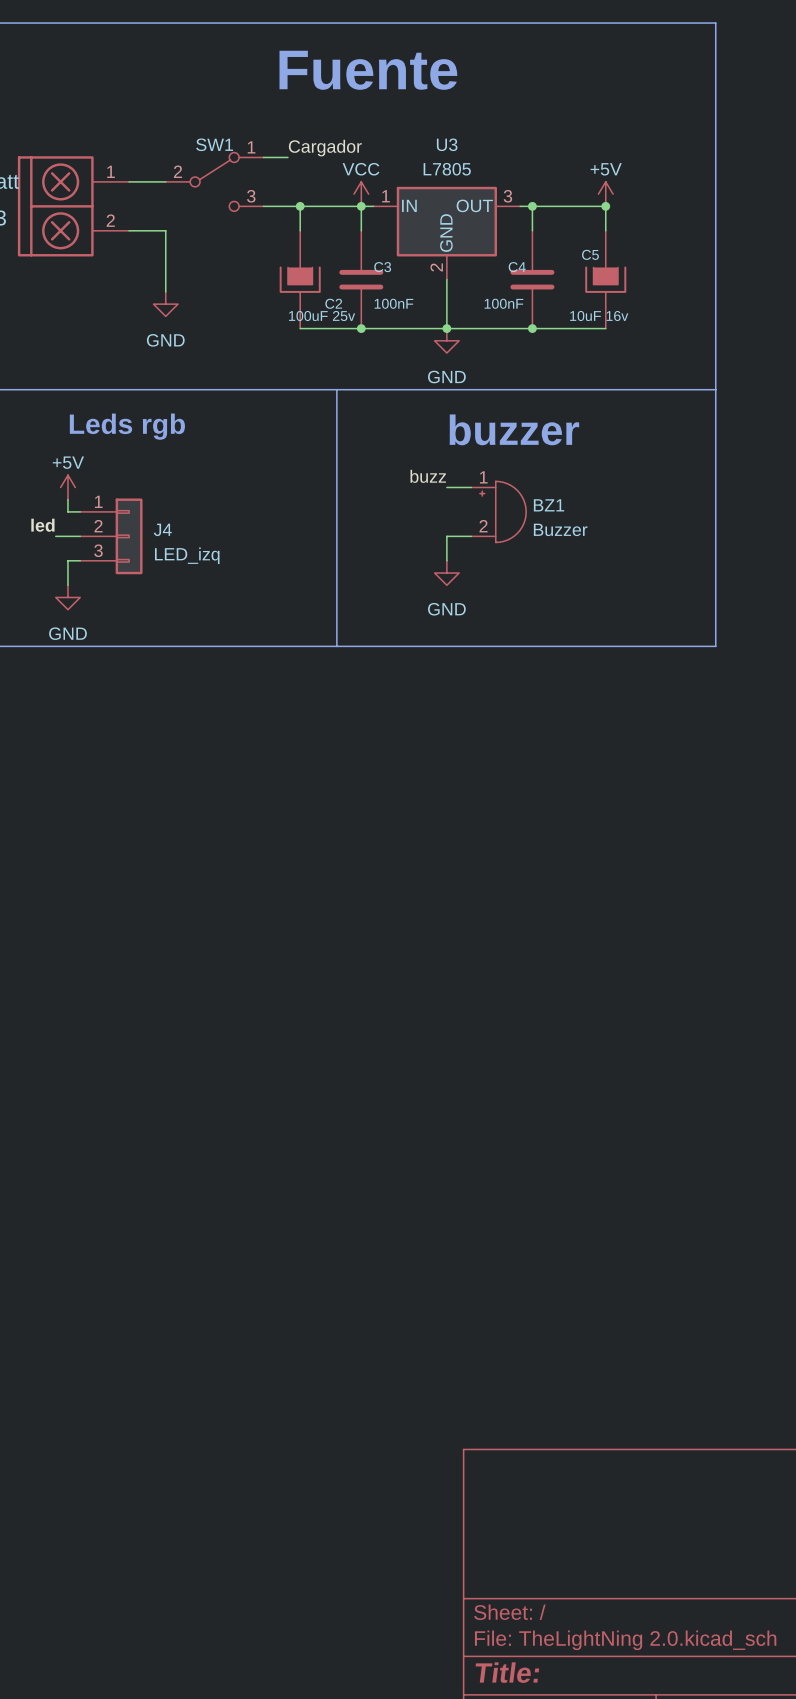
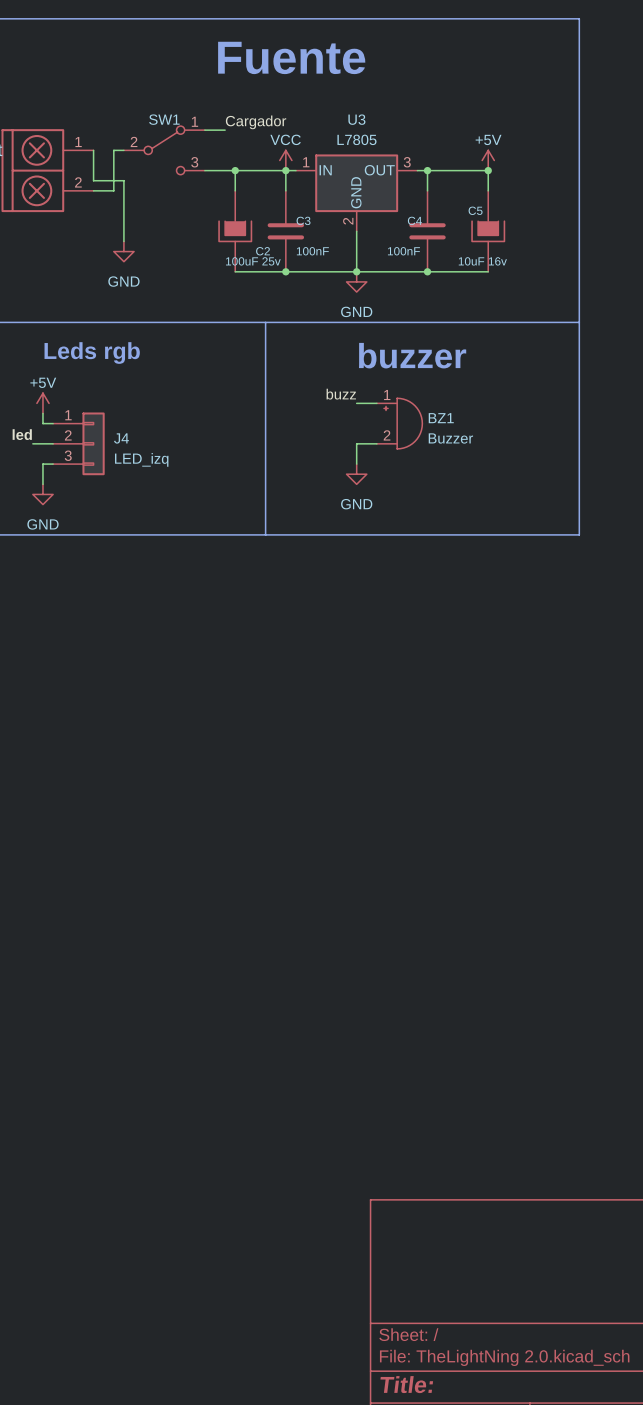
wire: (129, 181) (153, 181) -> (93, 150) (93, 180) (123, 180) (123, 190)
wire: (153, 230) (165, 230) -> (113, 190) (113, 150)

